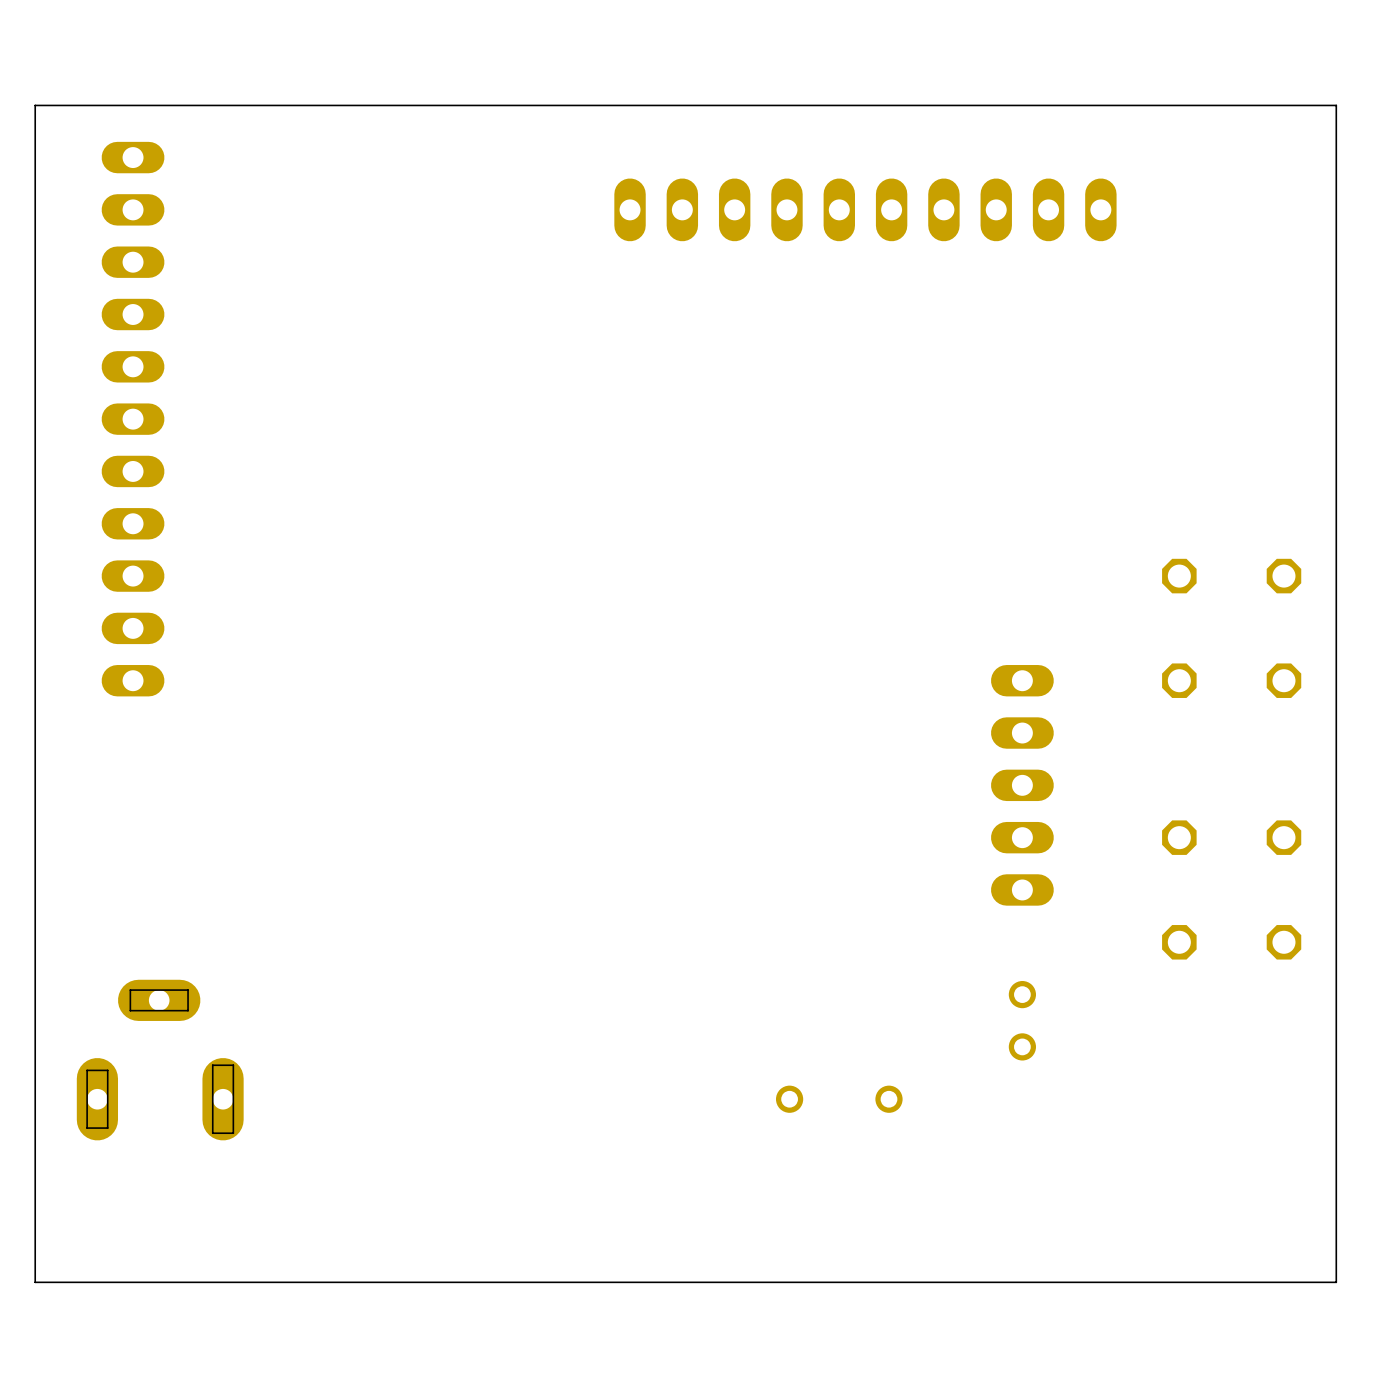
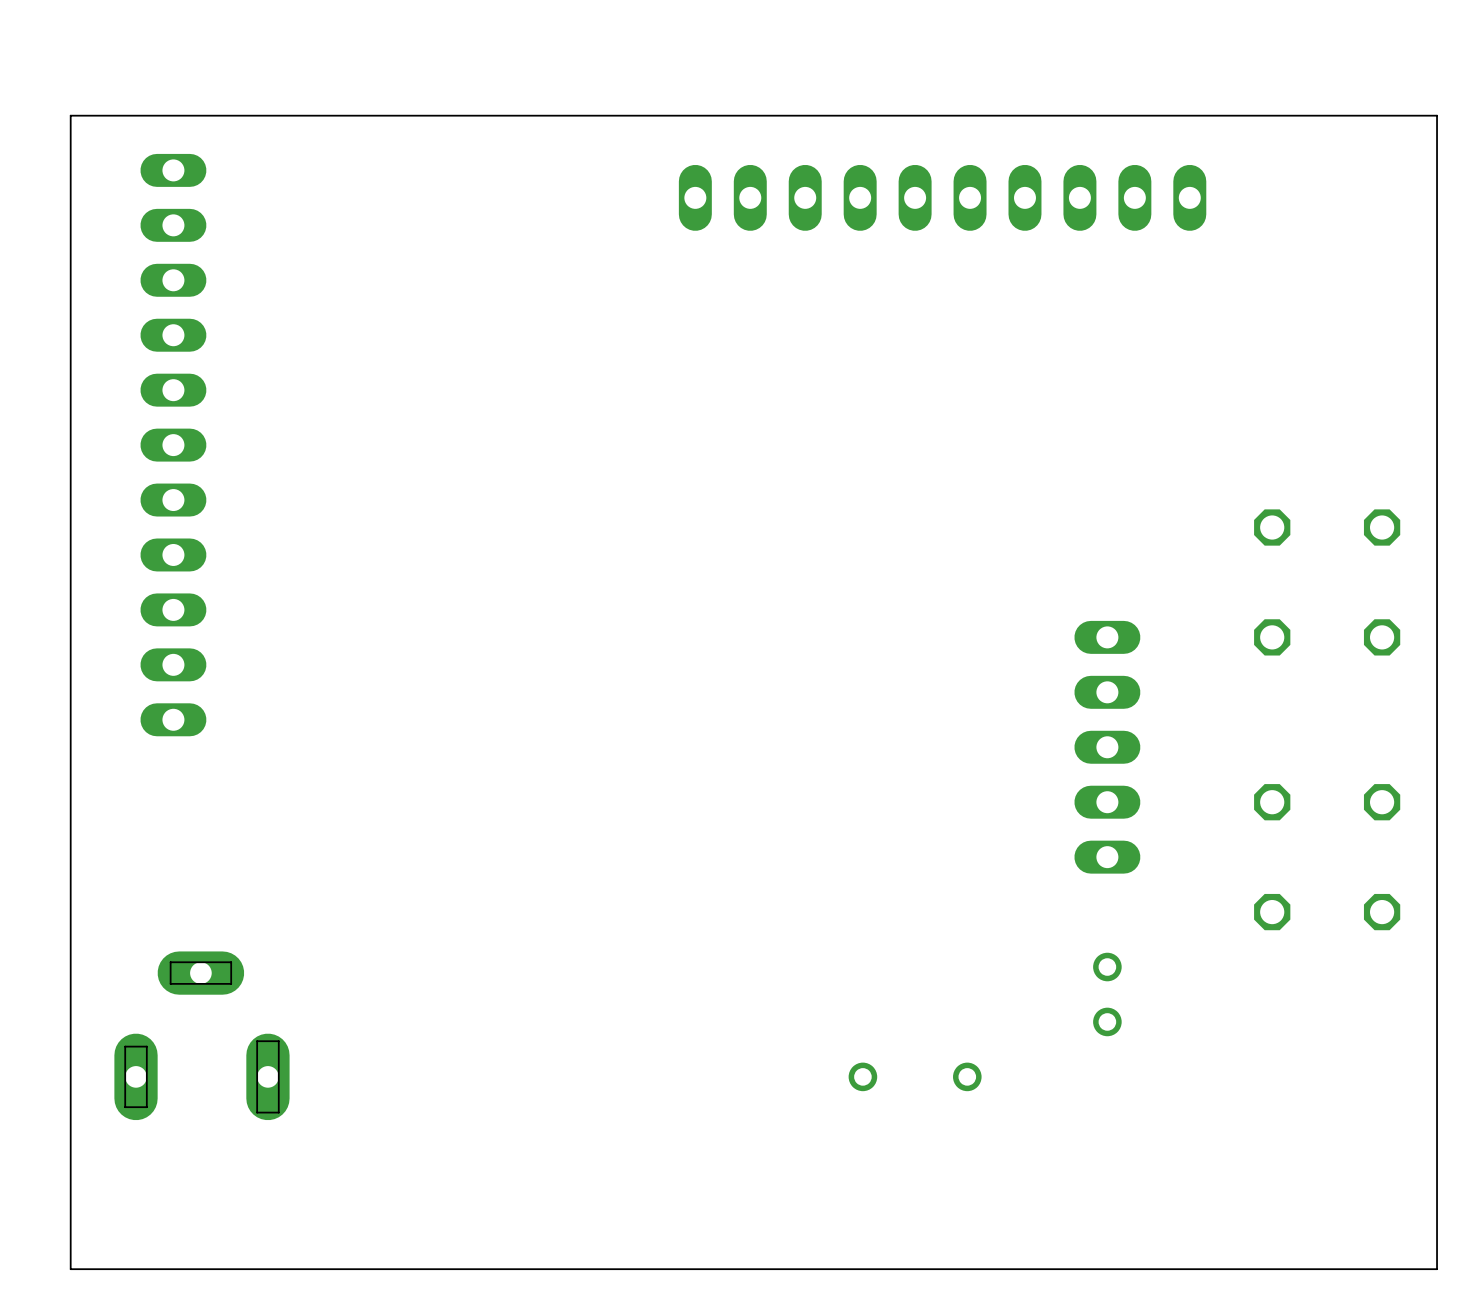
board edge: (1336, 183) (1336, 105) (35, 105) (35, 183) -> (1437, 115) (70, 115)
part position: (865, 209) -> (942, 197)
part position: (133, 419) -> (173, 445)

